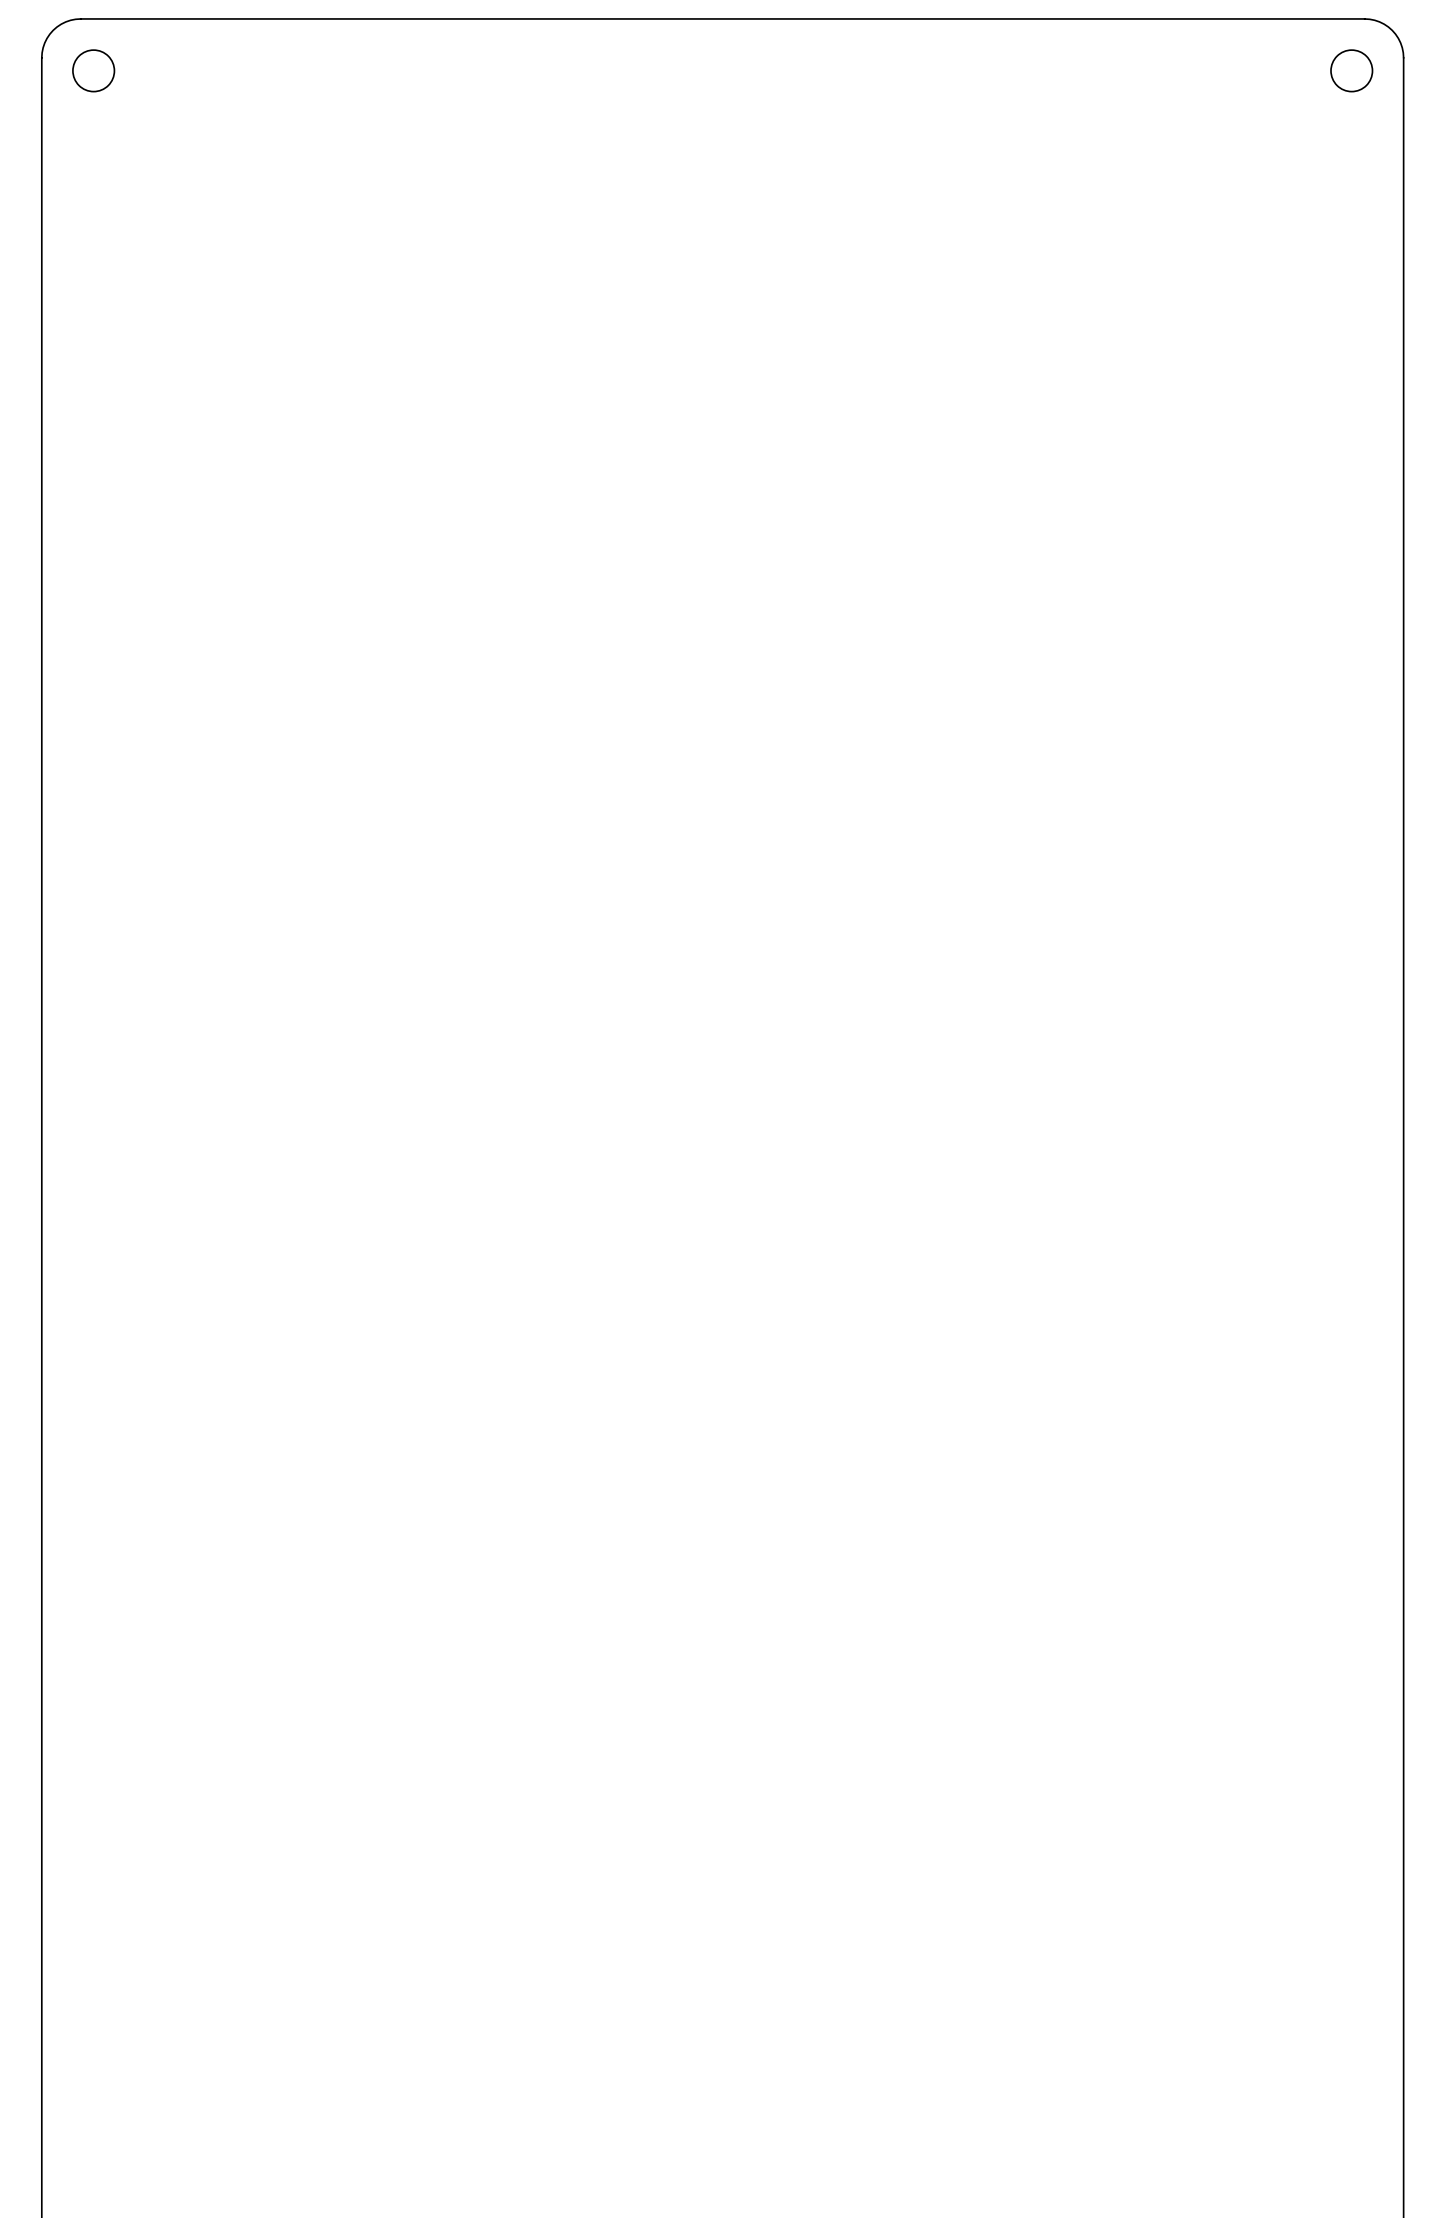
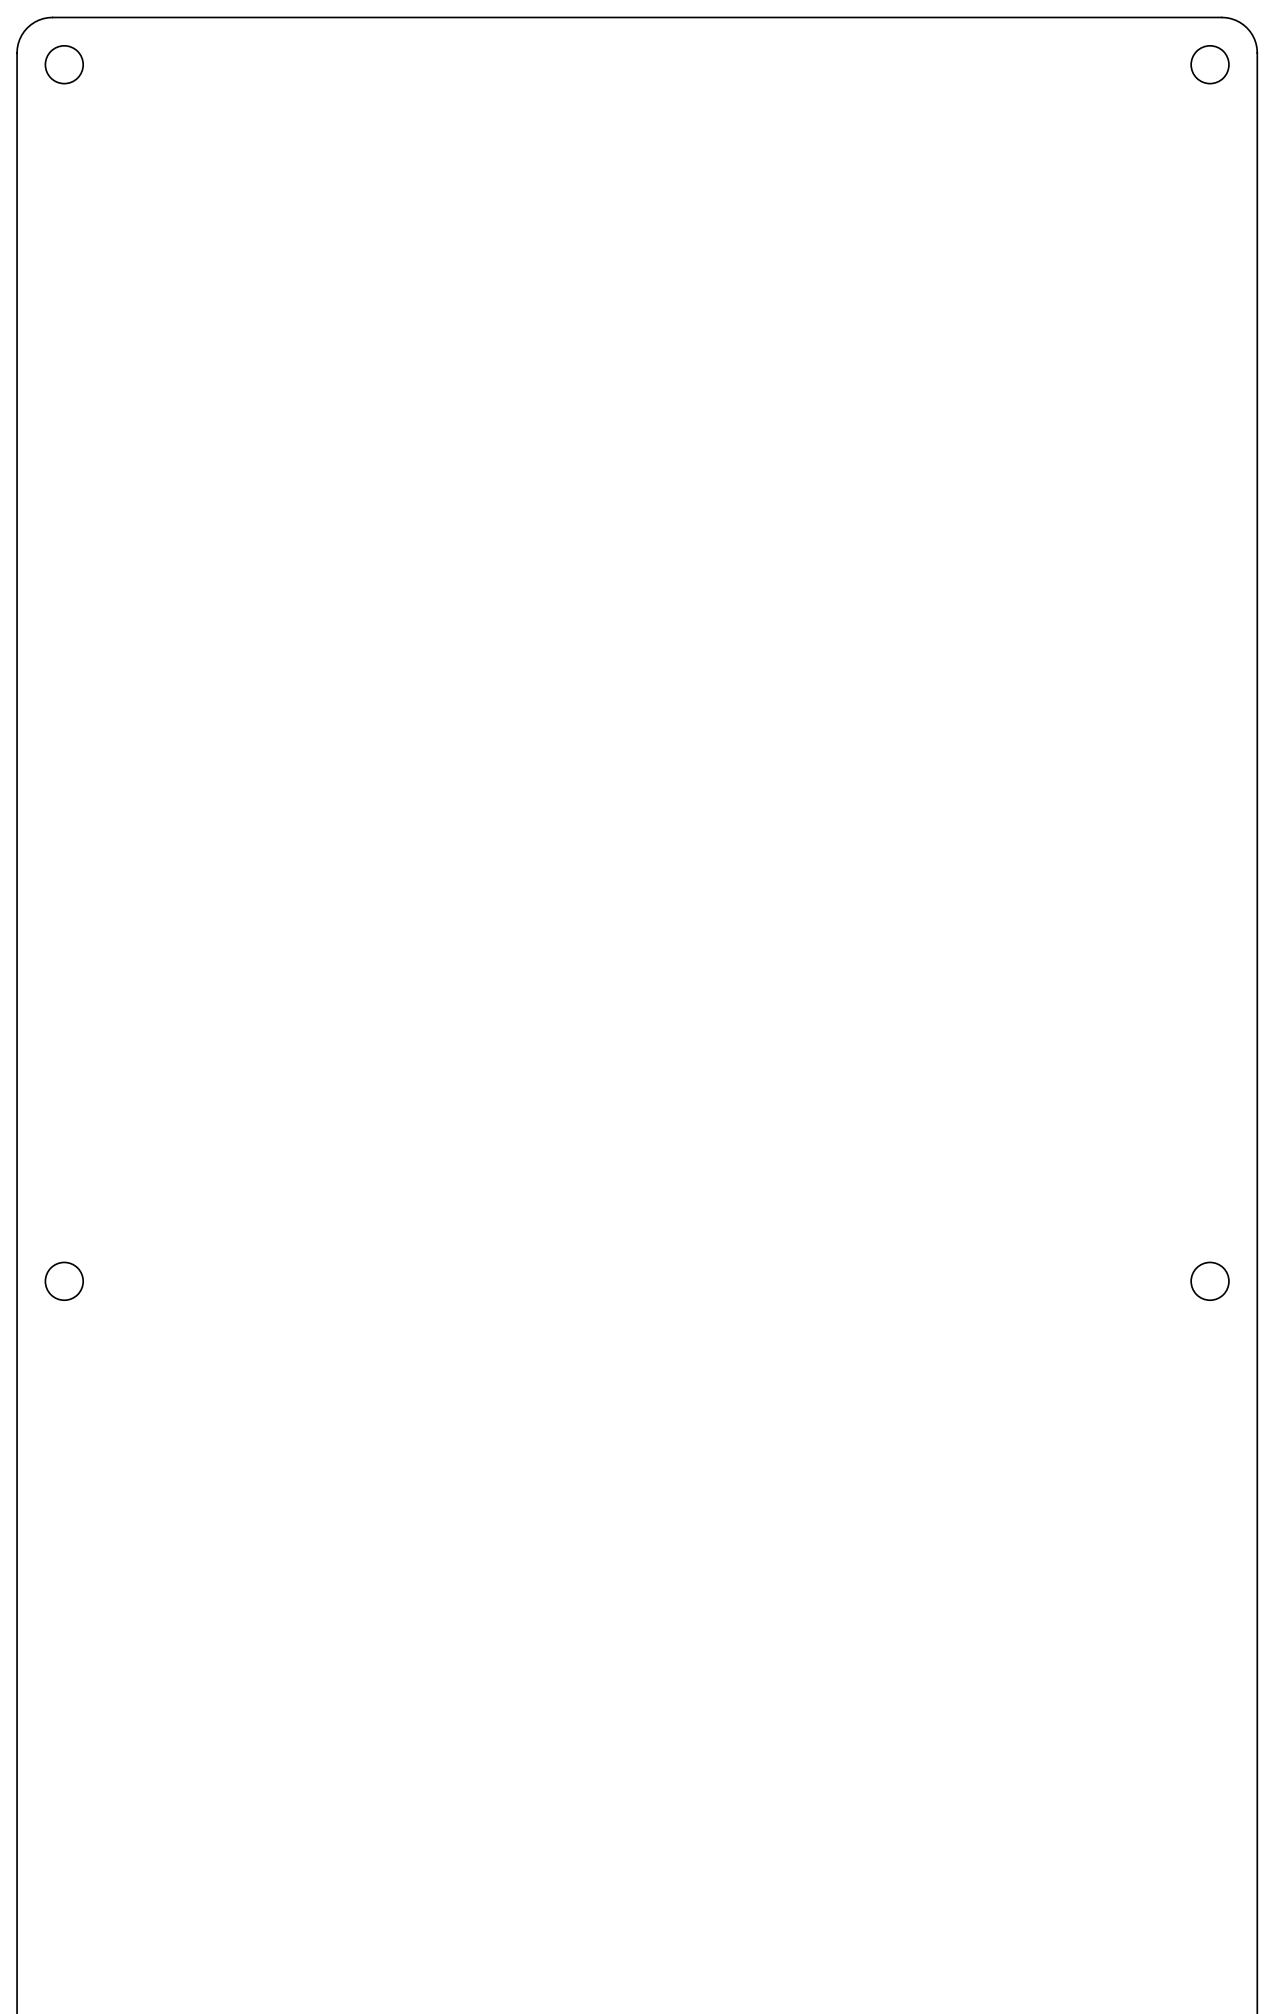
round board edge: none -> [45, 1262, 84, 1301]
round board edge: none -> [1190, 1262, 1230, 1301]

